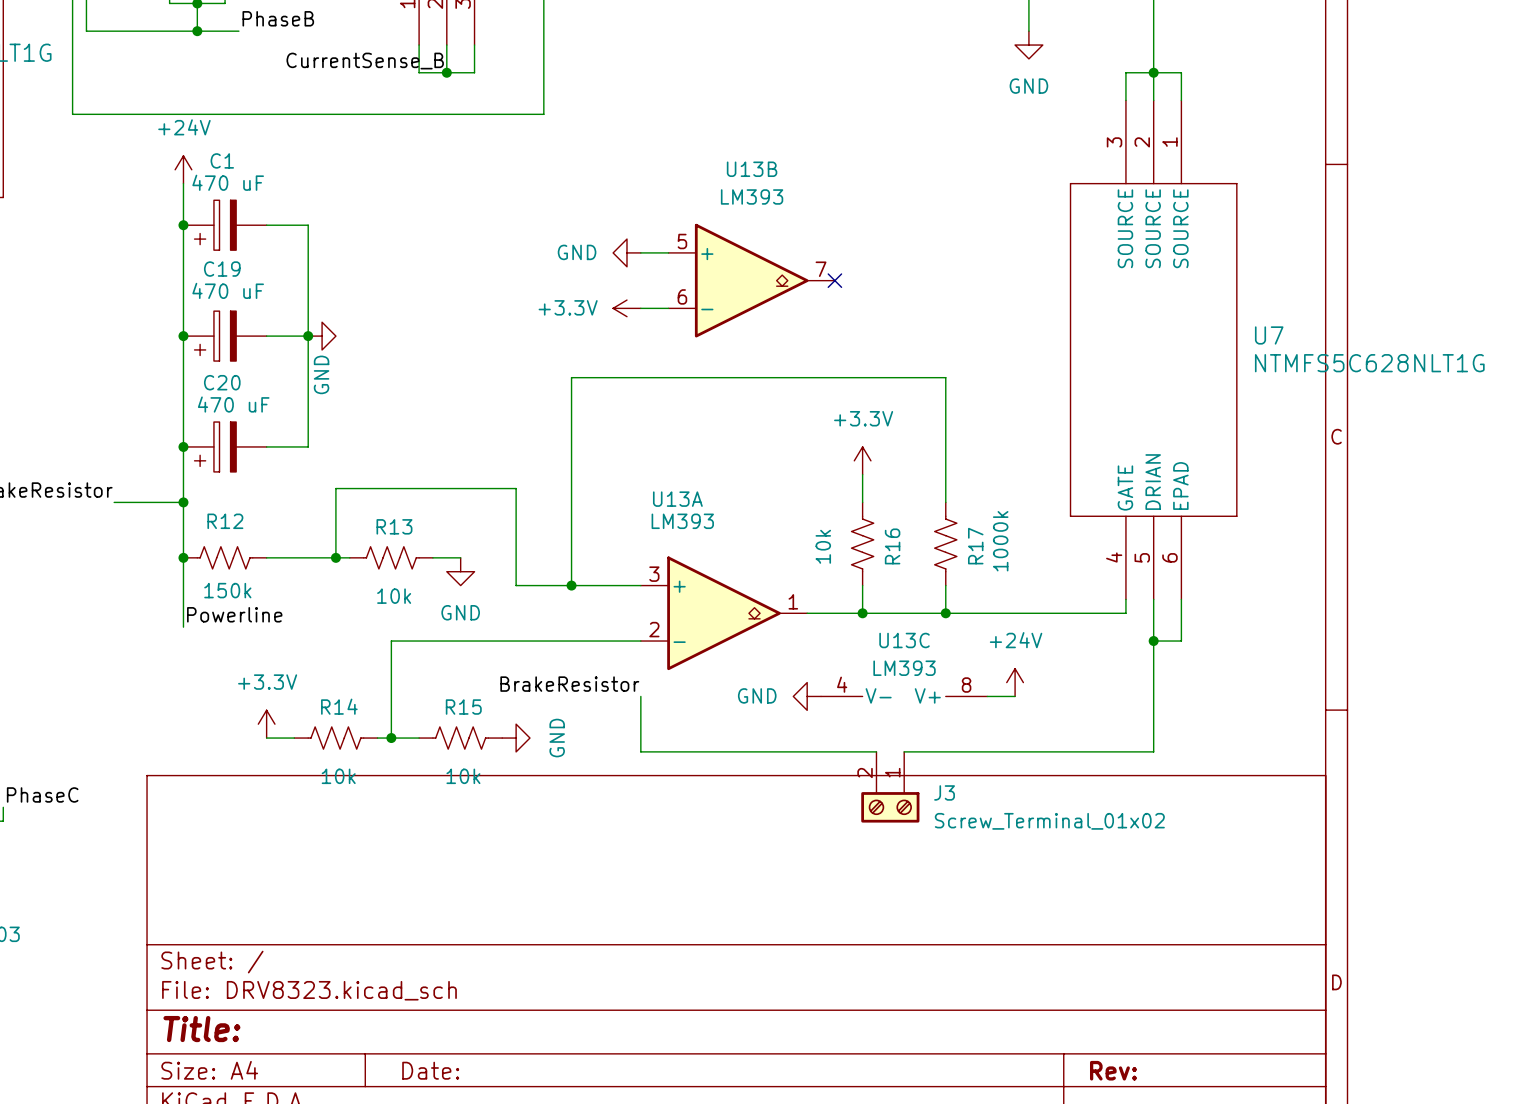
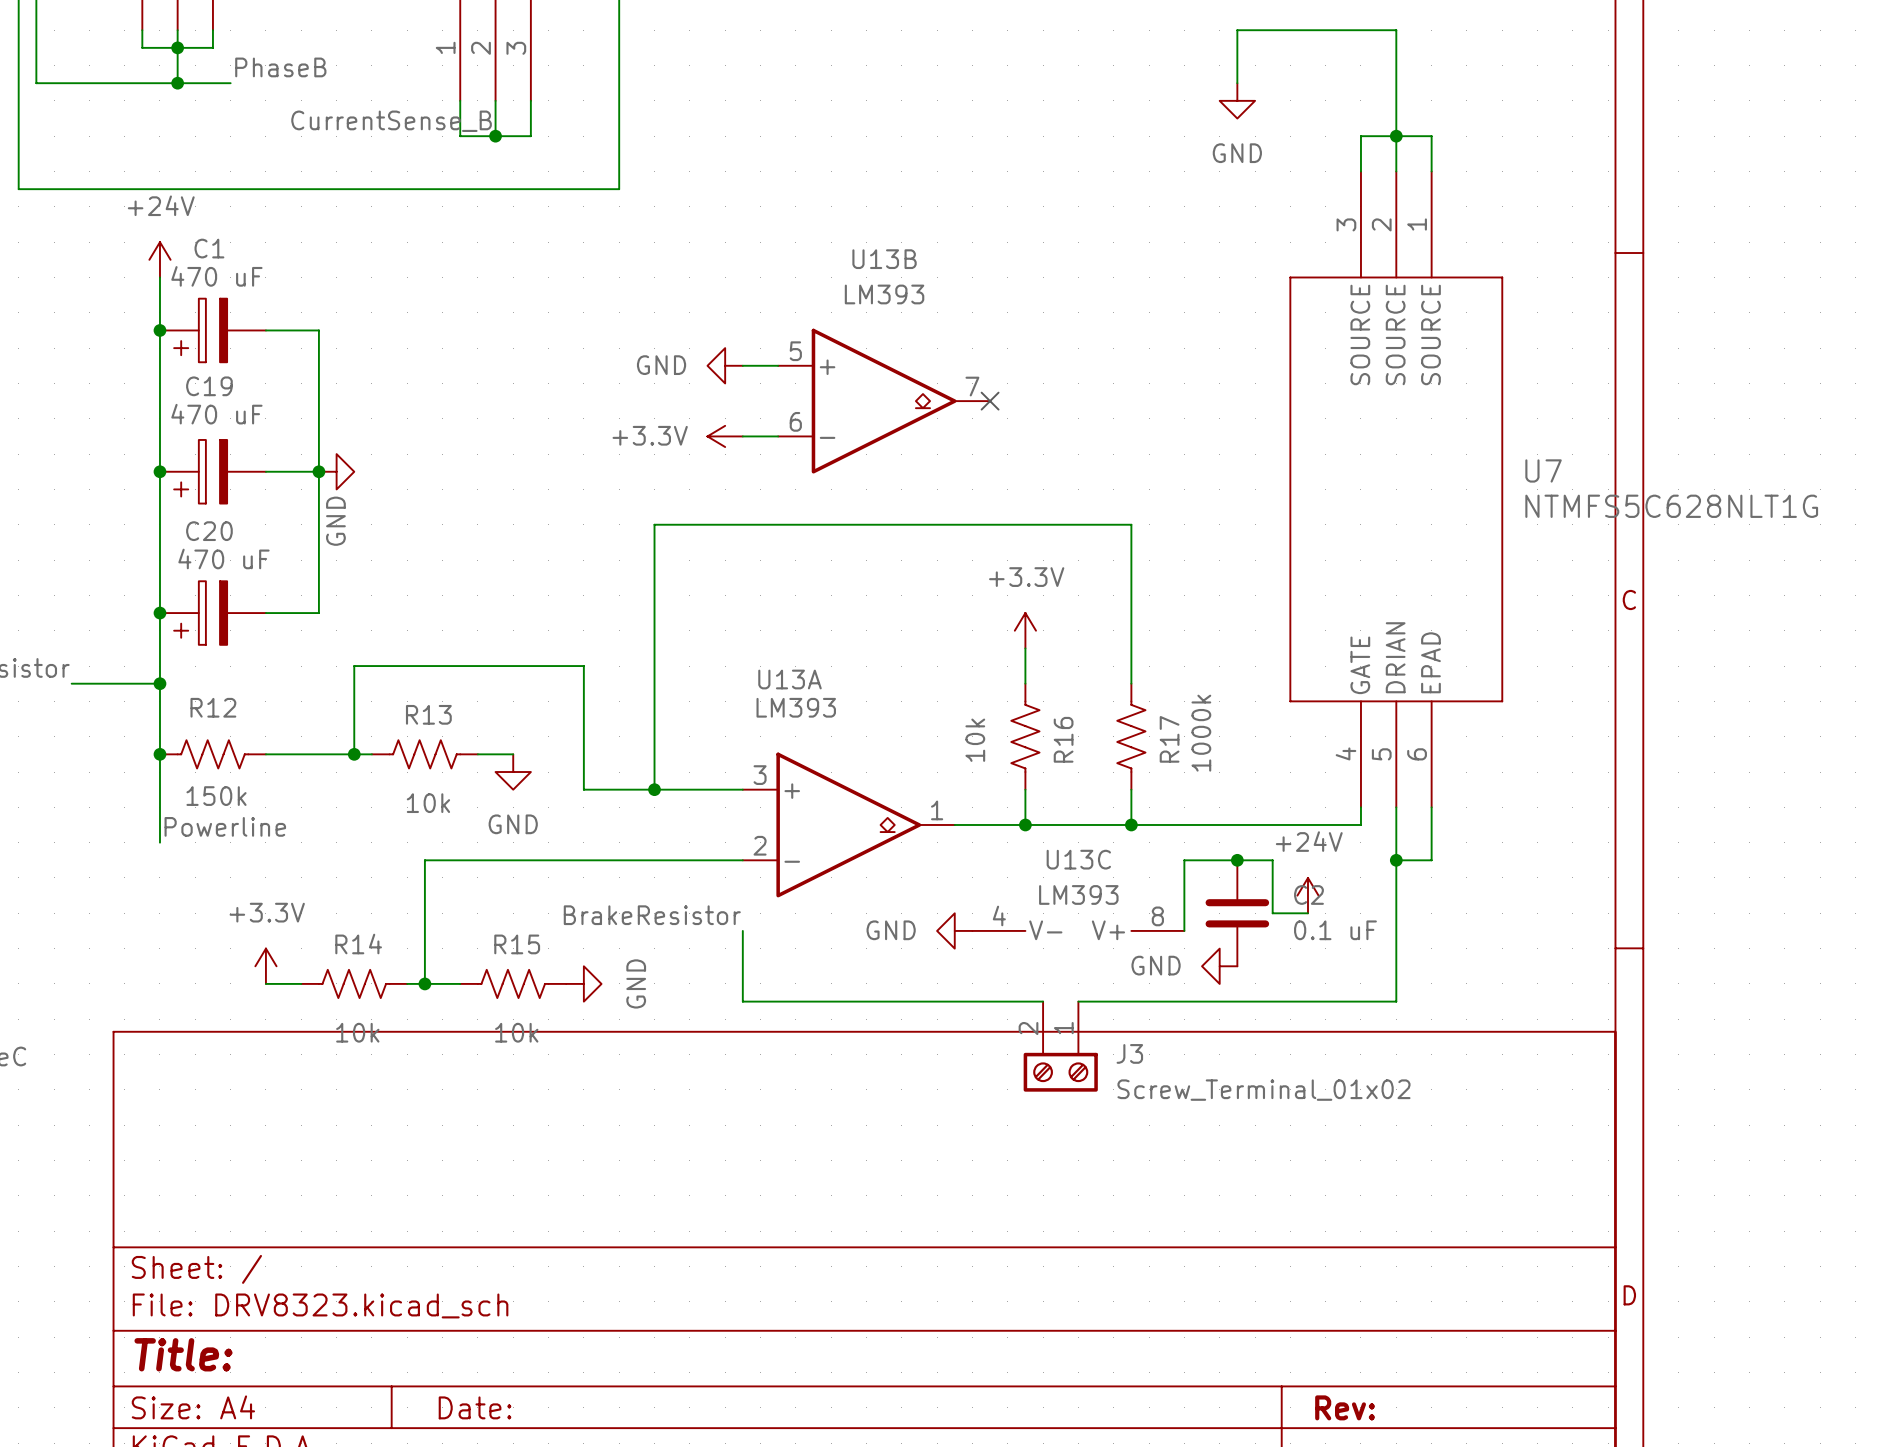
junction: none -> (1237, 860)
power symbol position: +24V (1015, 682) -> +24V (1308, 895)
C2: none -> 0.1 uF (1237, 913)
wire: (987, 696) (1015, 696) -> (1184, 930) (1184, 860) (1272, 860) (1272, 913) (1308, 913)
power symbol: none -> GND (1219, 966)

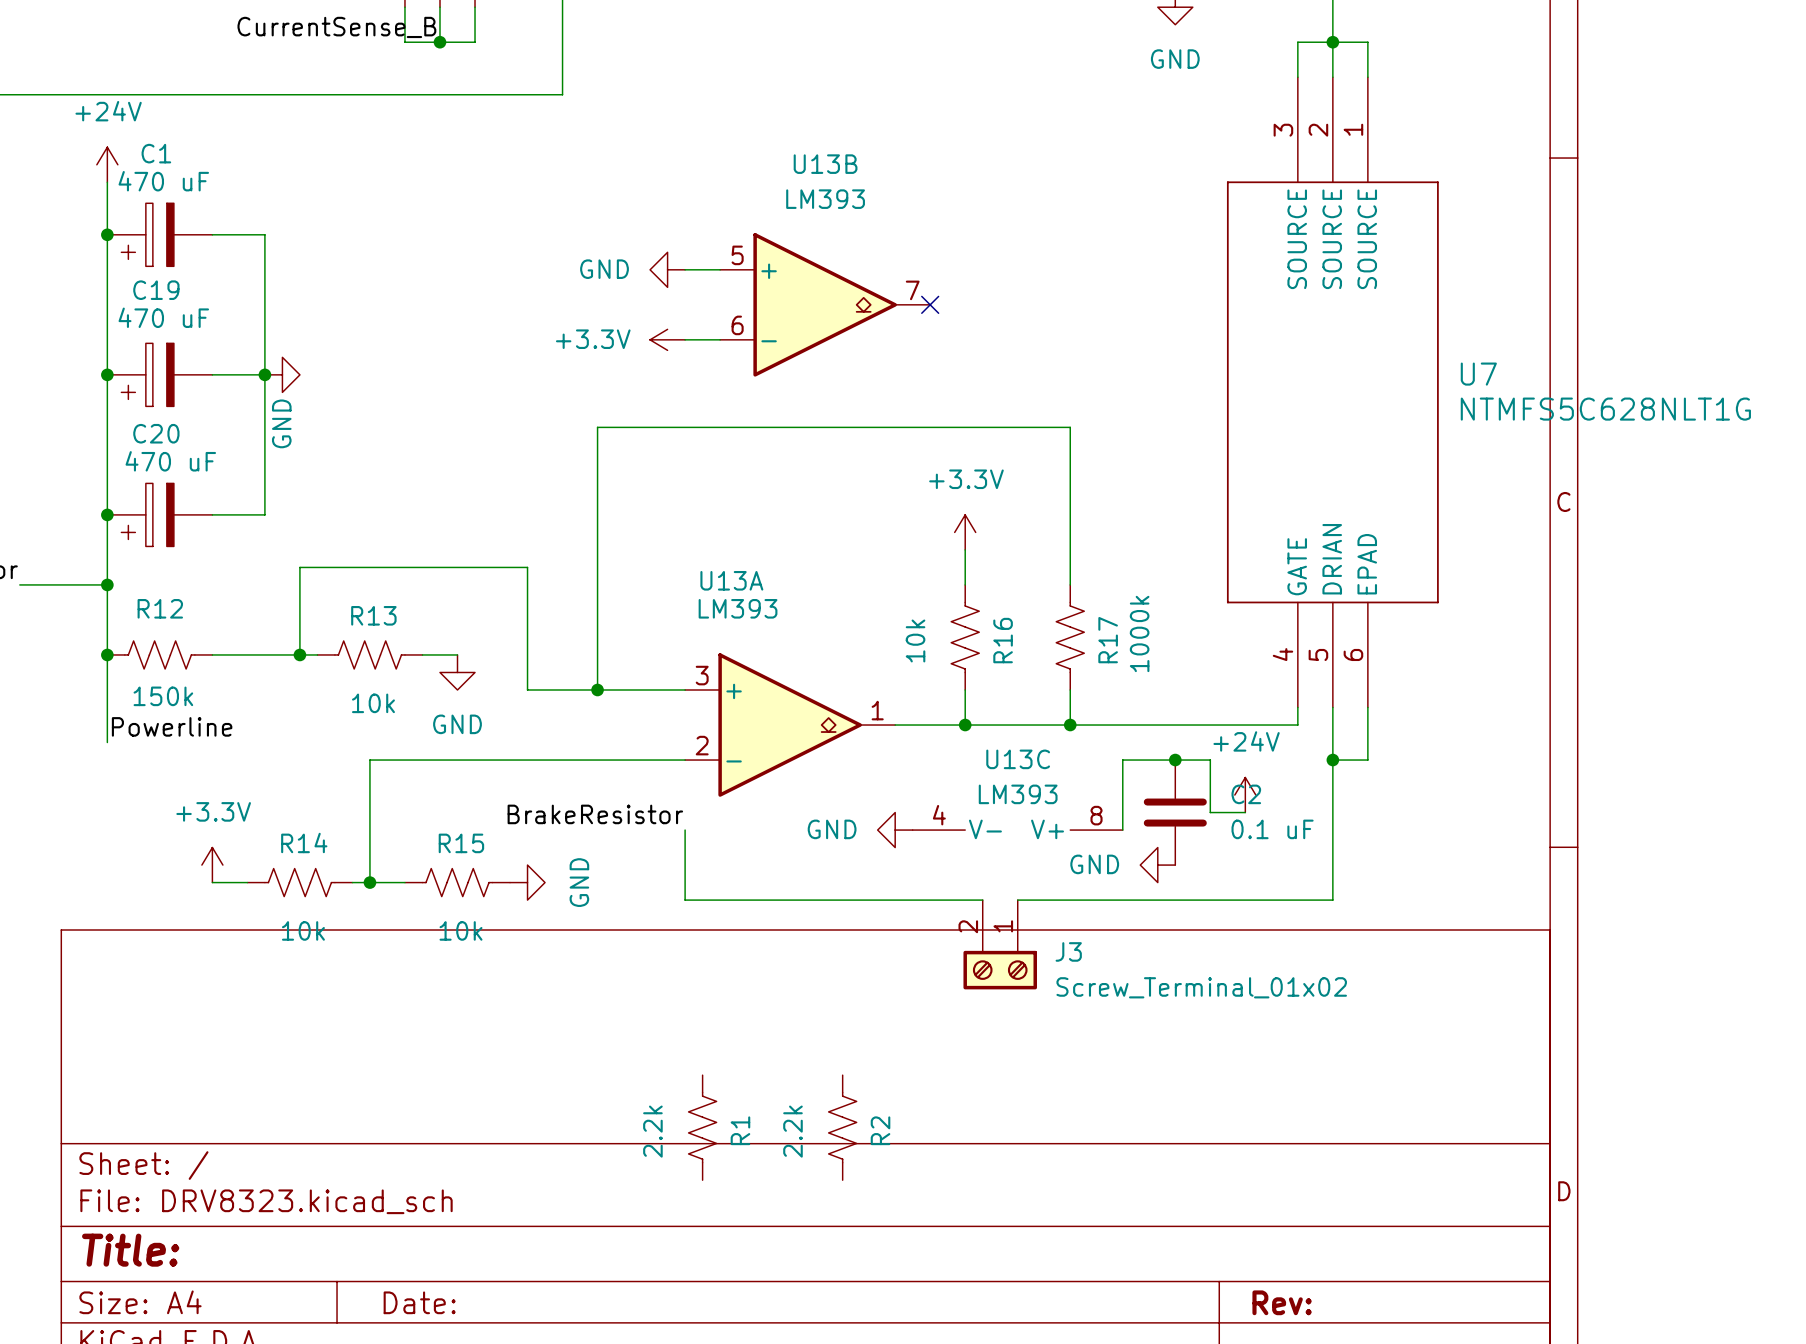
R1: none -> 2.2k (702, 1127)
R2: none -> 2.2k (842, 1127)

